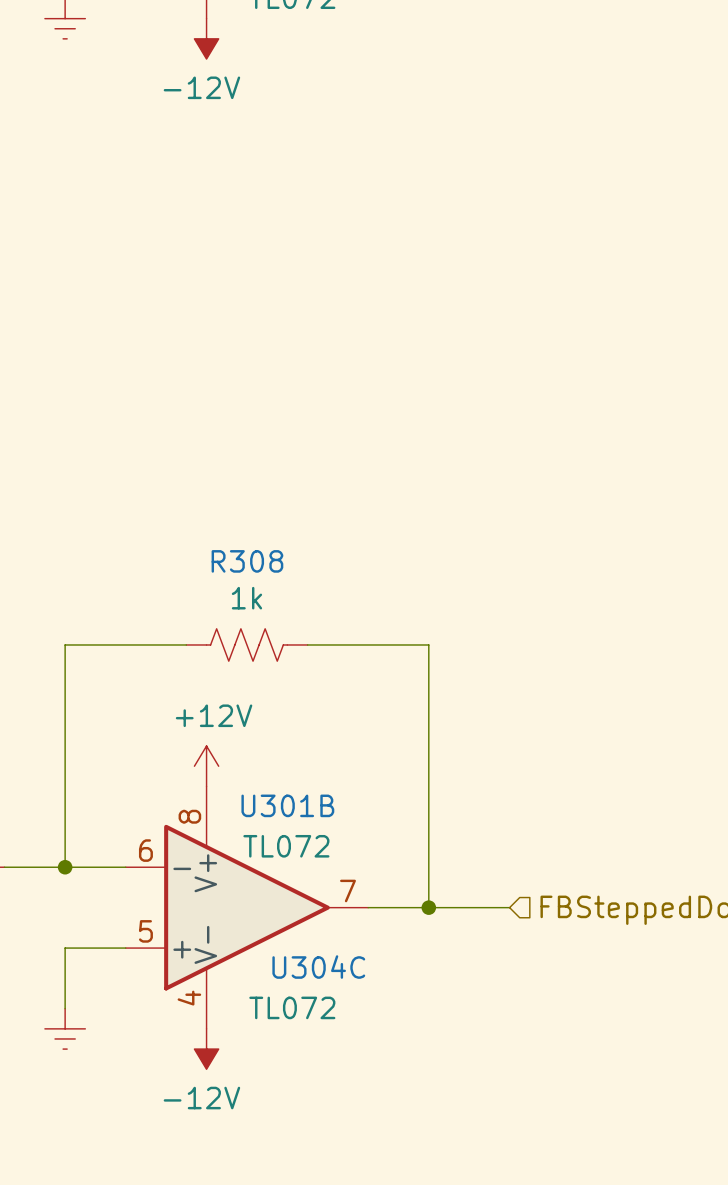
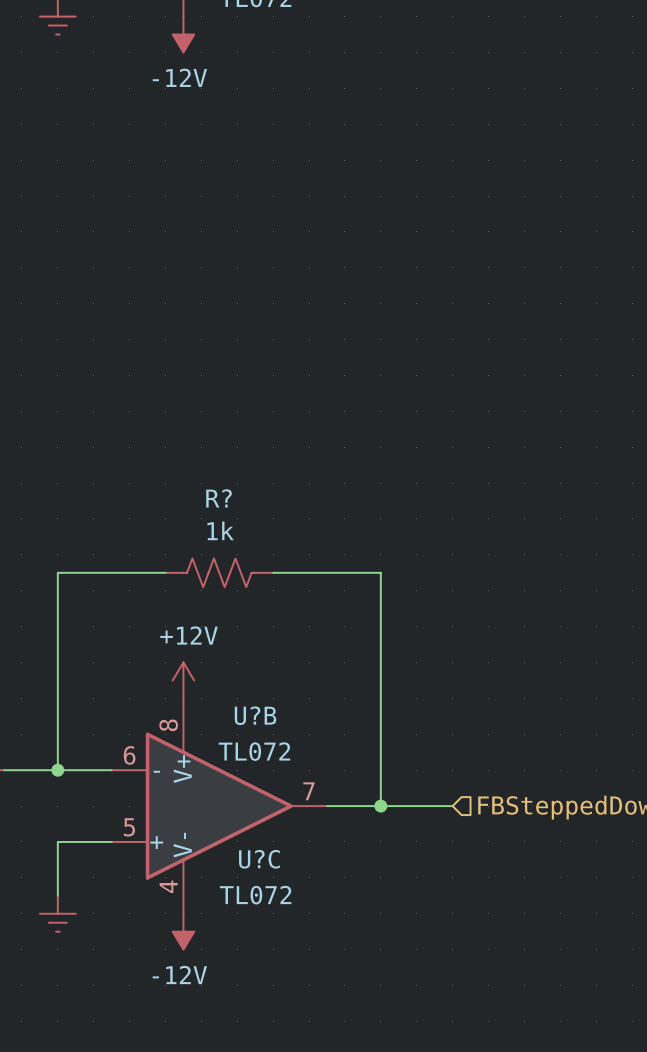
R308 name: R308 (247, 561) -> R? (219, 498)
U301B name: U301B (287, 805) -> U?B (255, 715)
U304C name: U304C (318, 967) -> U?C (259, 859)

